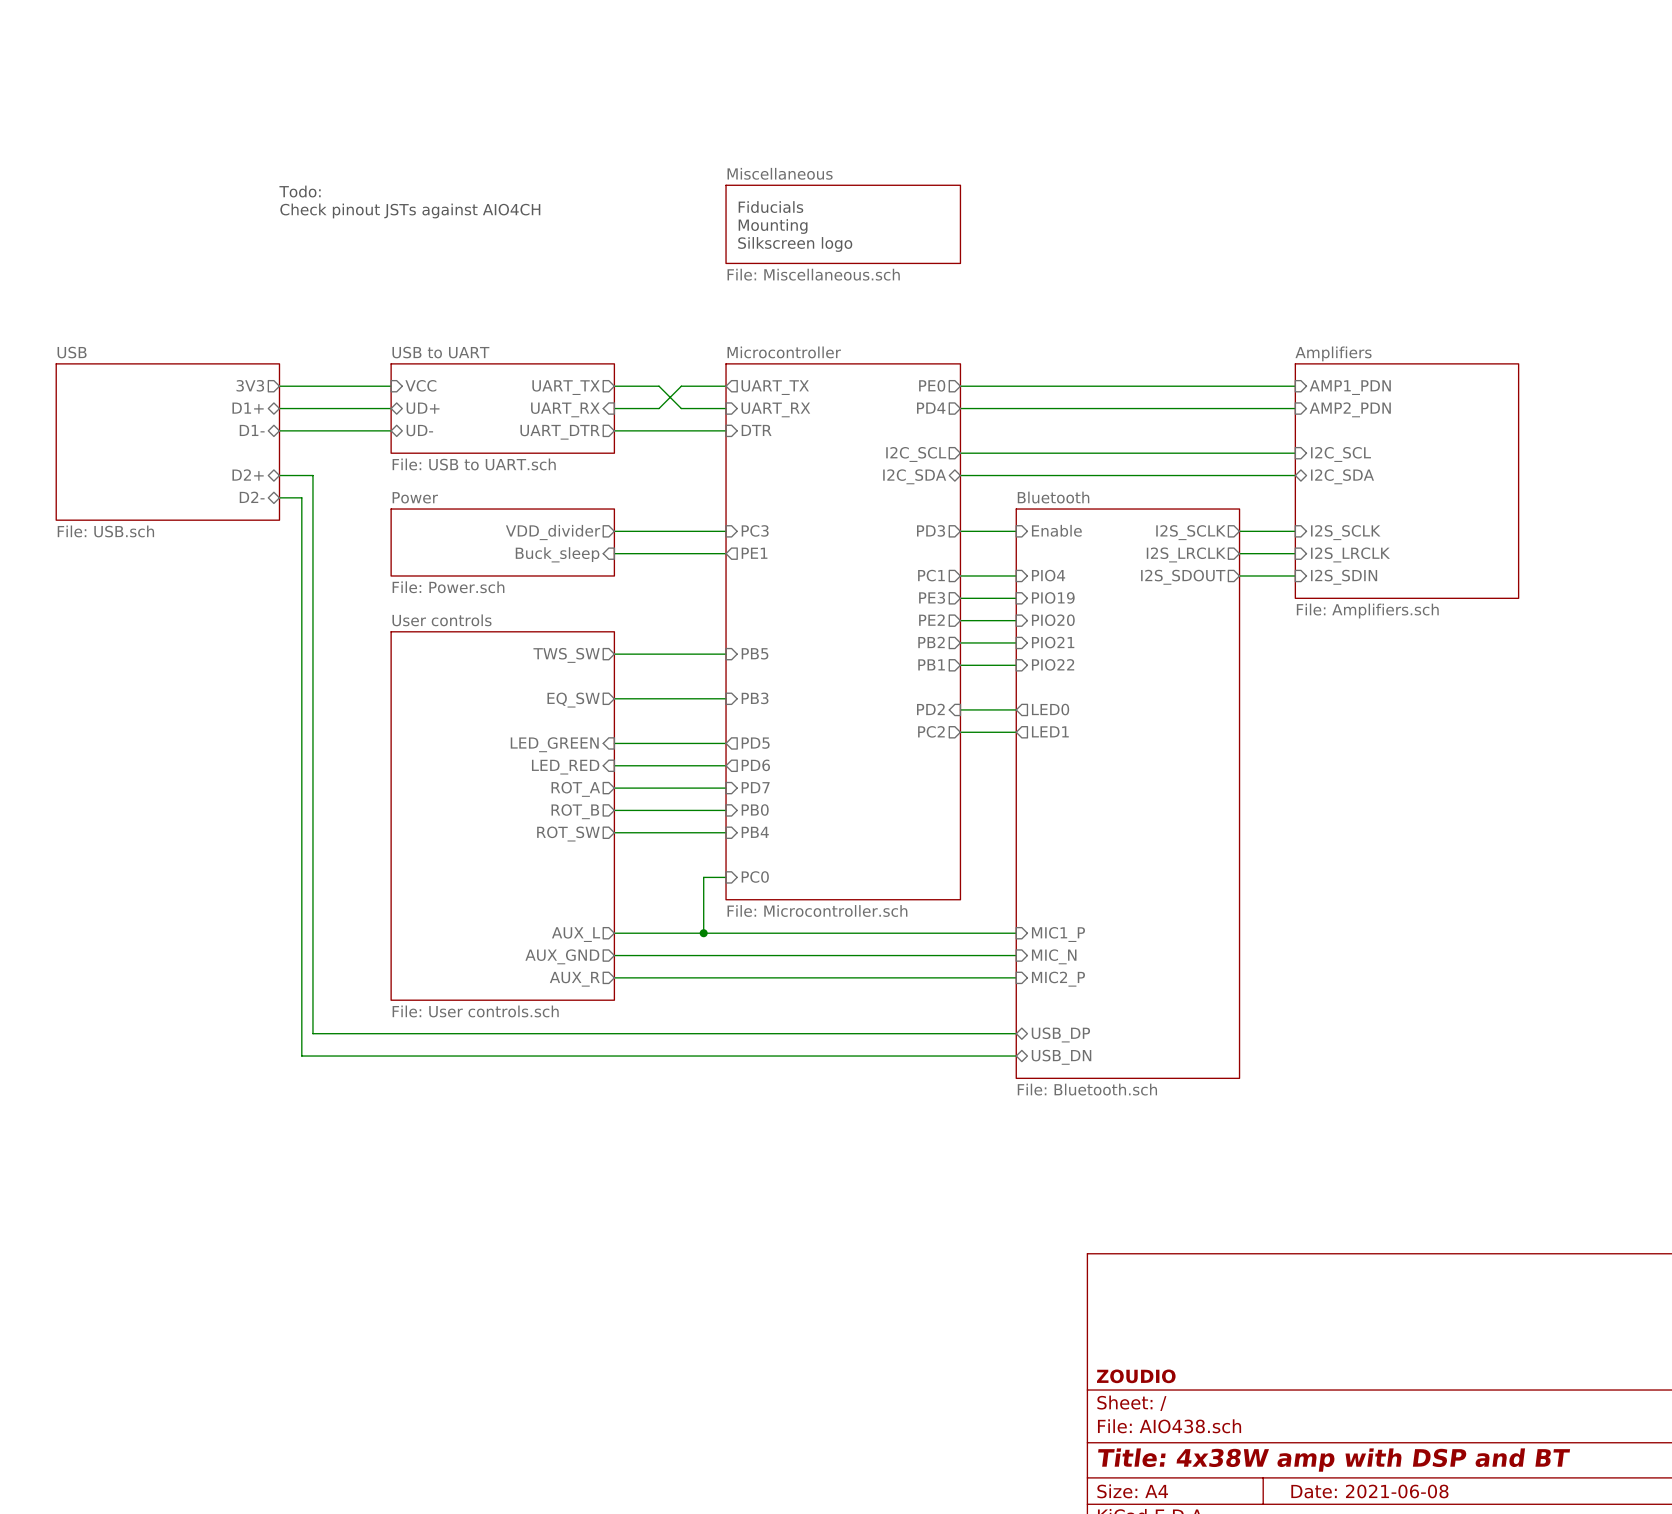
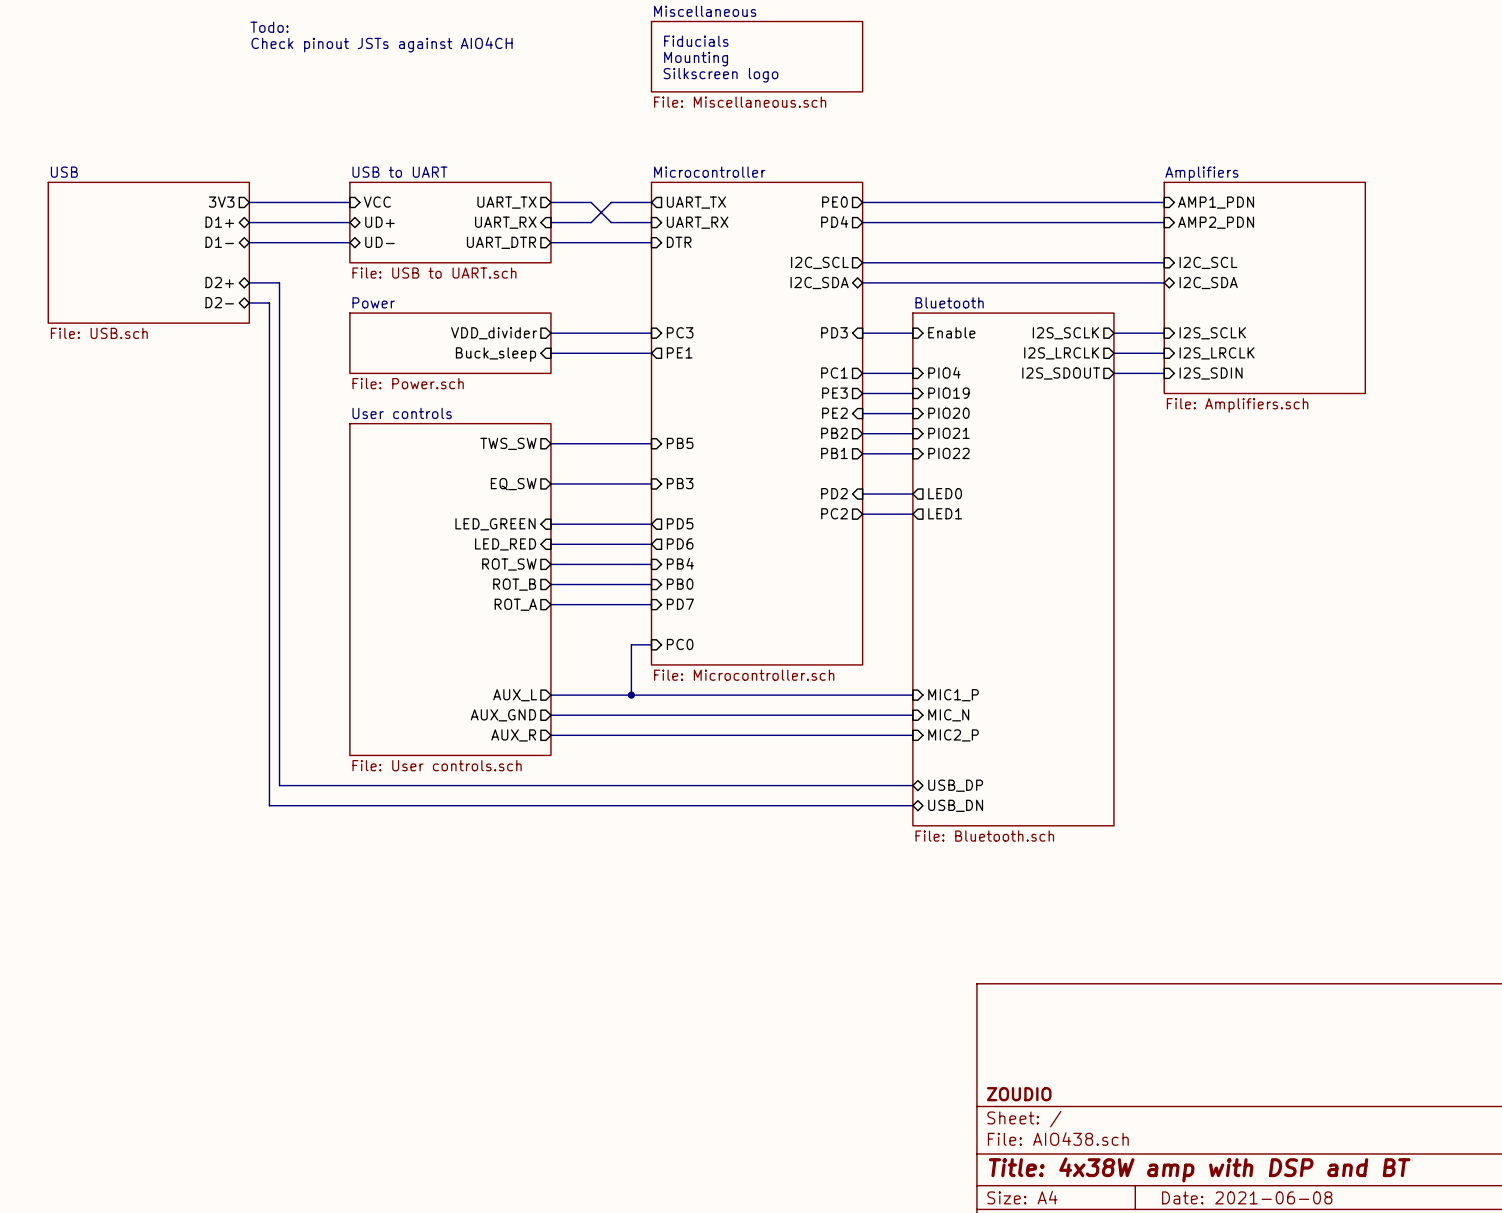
sheet pin shape: output (931, 530) -> input (834, 332)
sheet pin shape: output (931, 620) -> input (834, 413)
sheet pin: PD7 (755, 787) -> PB4 (680, 563)
sheet pin: ROT_A (575, 789) -> ROT_SW (509, 564)
sheet pin: PB4 (755, 832) -> PD7 (680, 604)
sheet pin: ROT_SW (568, 834) -> ROT_A (515, 604)

